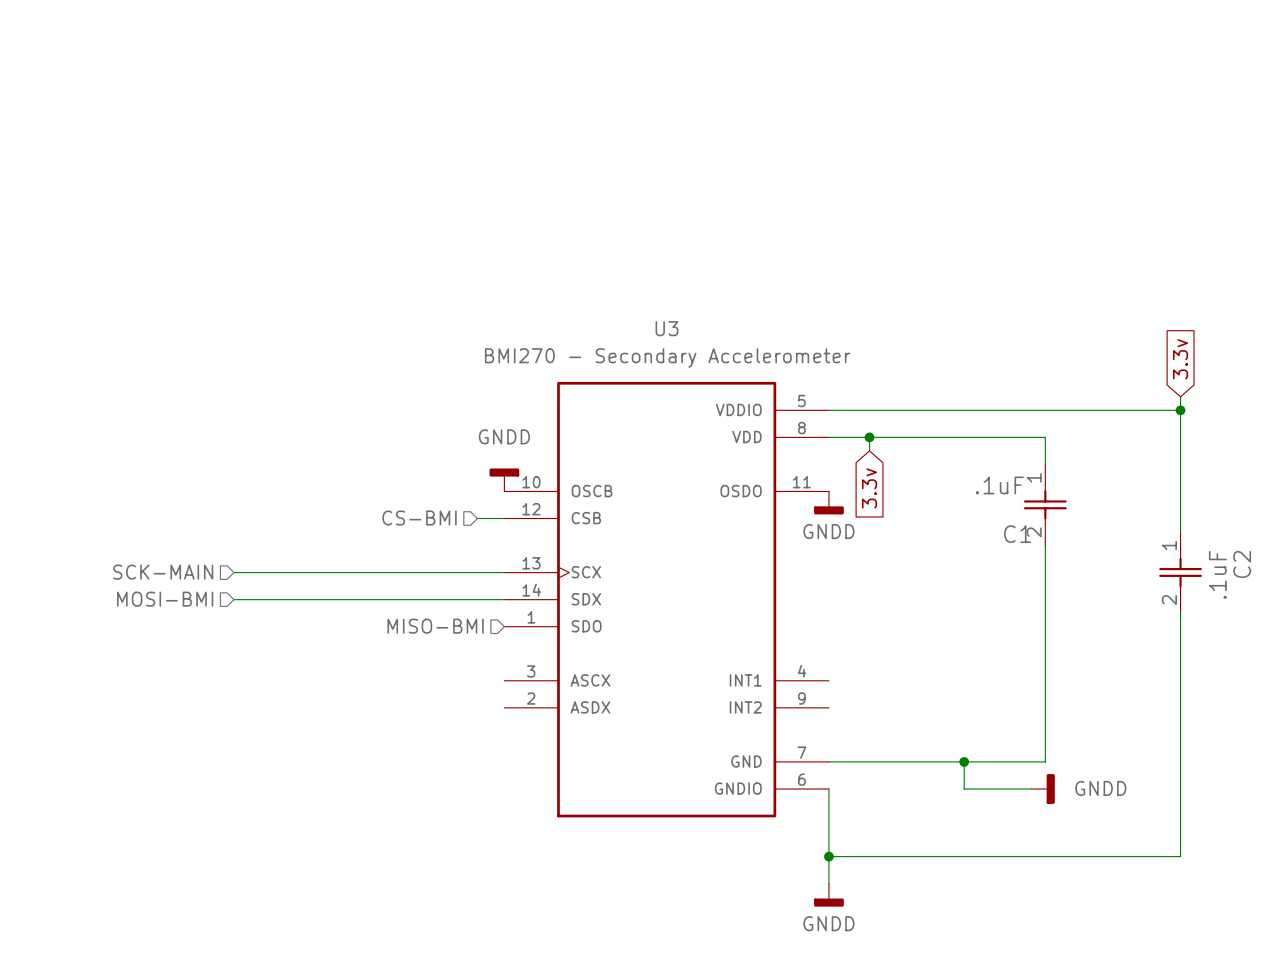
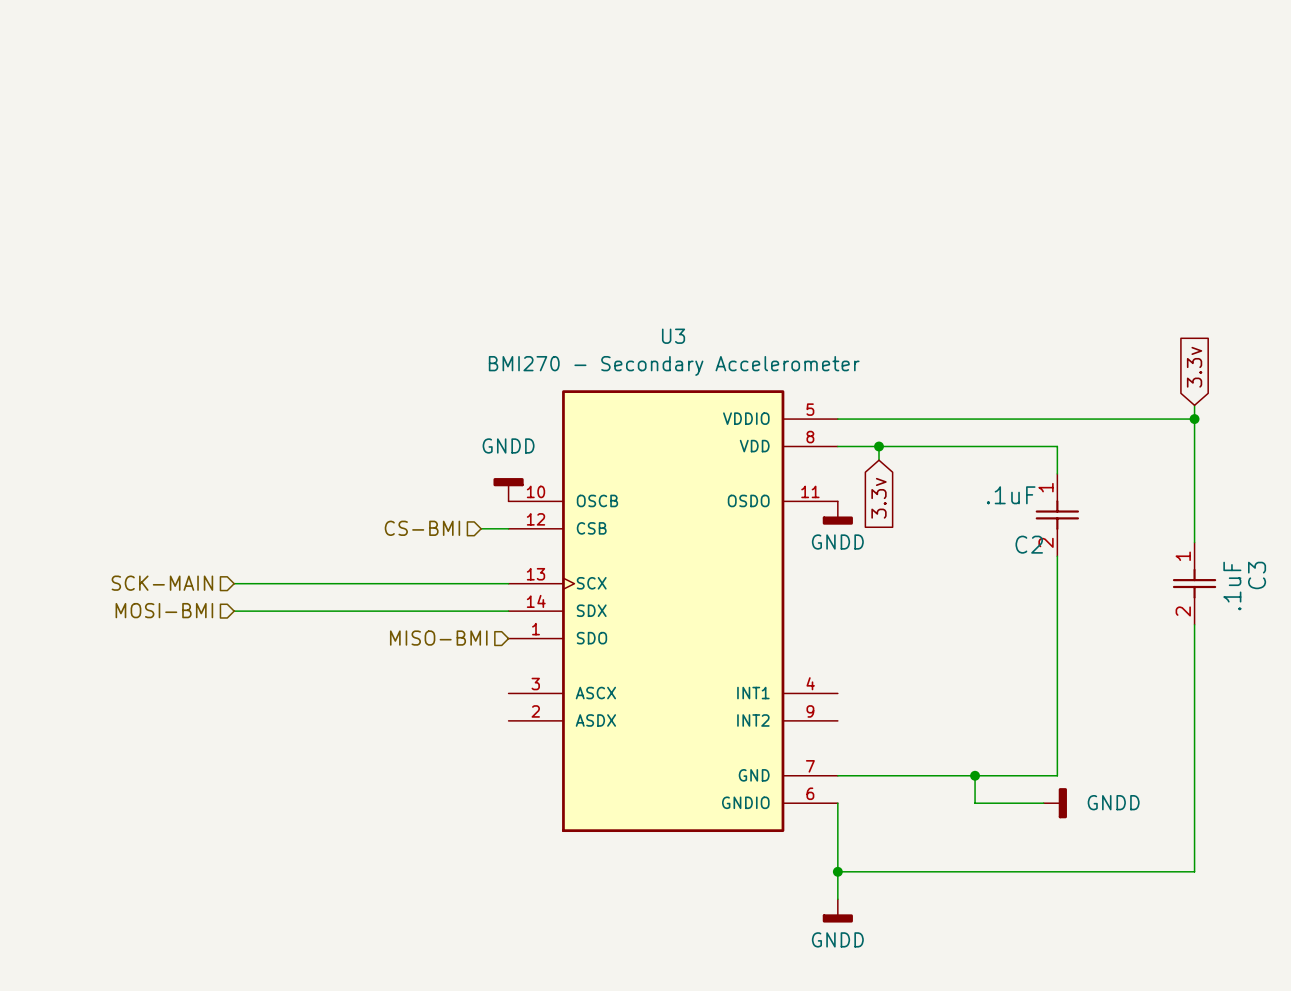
C1 name: C1 (1017, 534) -> C2 (1029, 544)
C2 name: C2 (1242, 564) -> C3 (1257, 575)

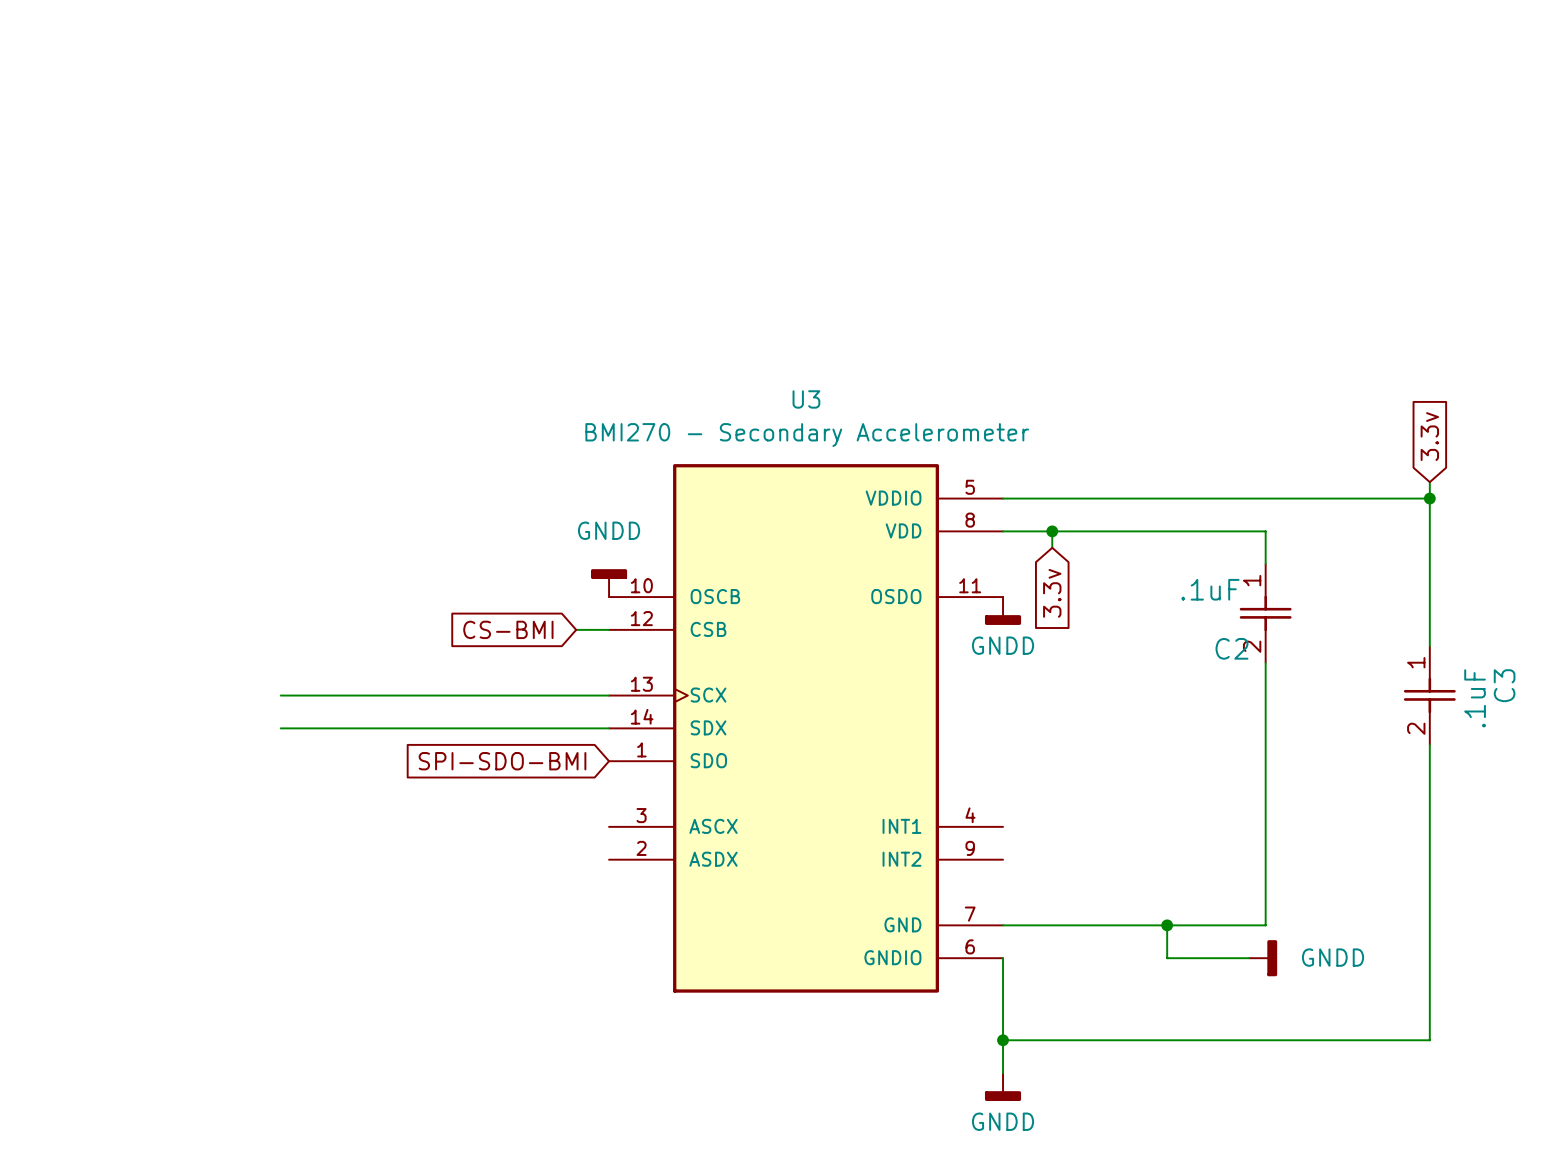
hierarchical label: CS-BMI (422, 528) -> none
global label: none -> CS-BMI (508, 629)
hierarchical label: SCK-MAIN (162, 583) -> none
hierarchical label: MOSI-BMI (164, 610) -> none
global label: none -> SPI-SDO-BMI (502, 761)
hierarchical label: MISO-BMI (438, 638) -> none

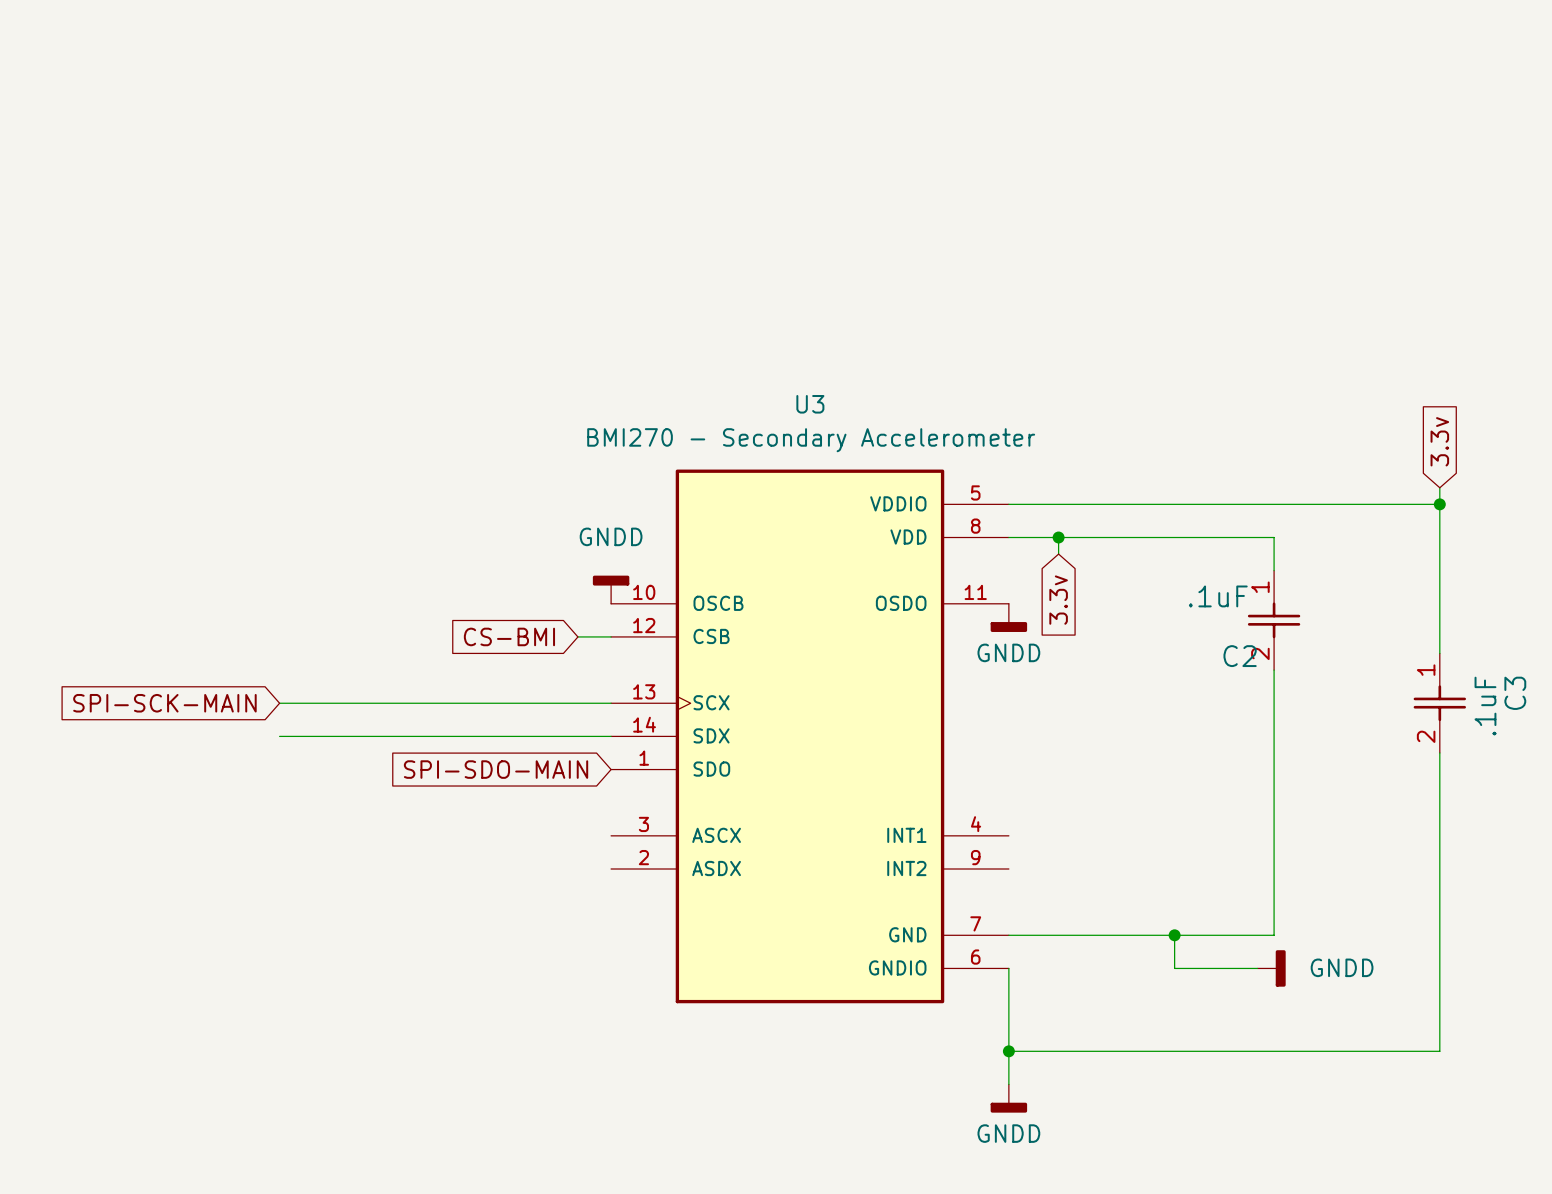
global label: none -> SPI-SCK-MAIN (164, 703)
global label: SPI-SDO-BMI (502, 761) -> SPI-SDO-MAIN (496, 769)

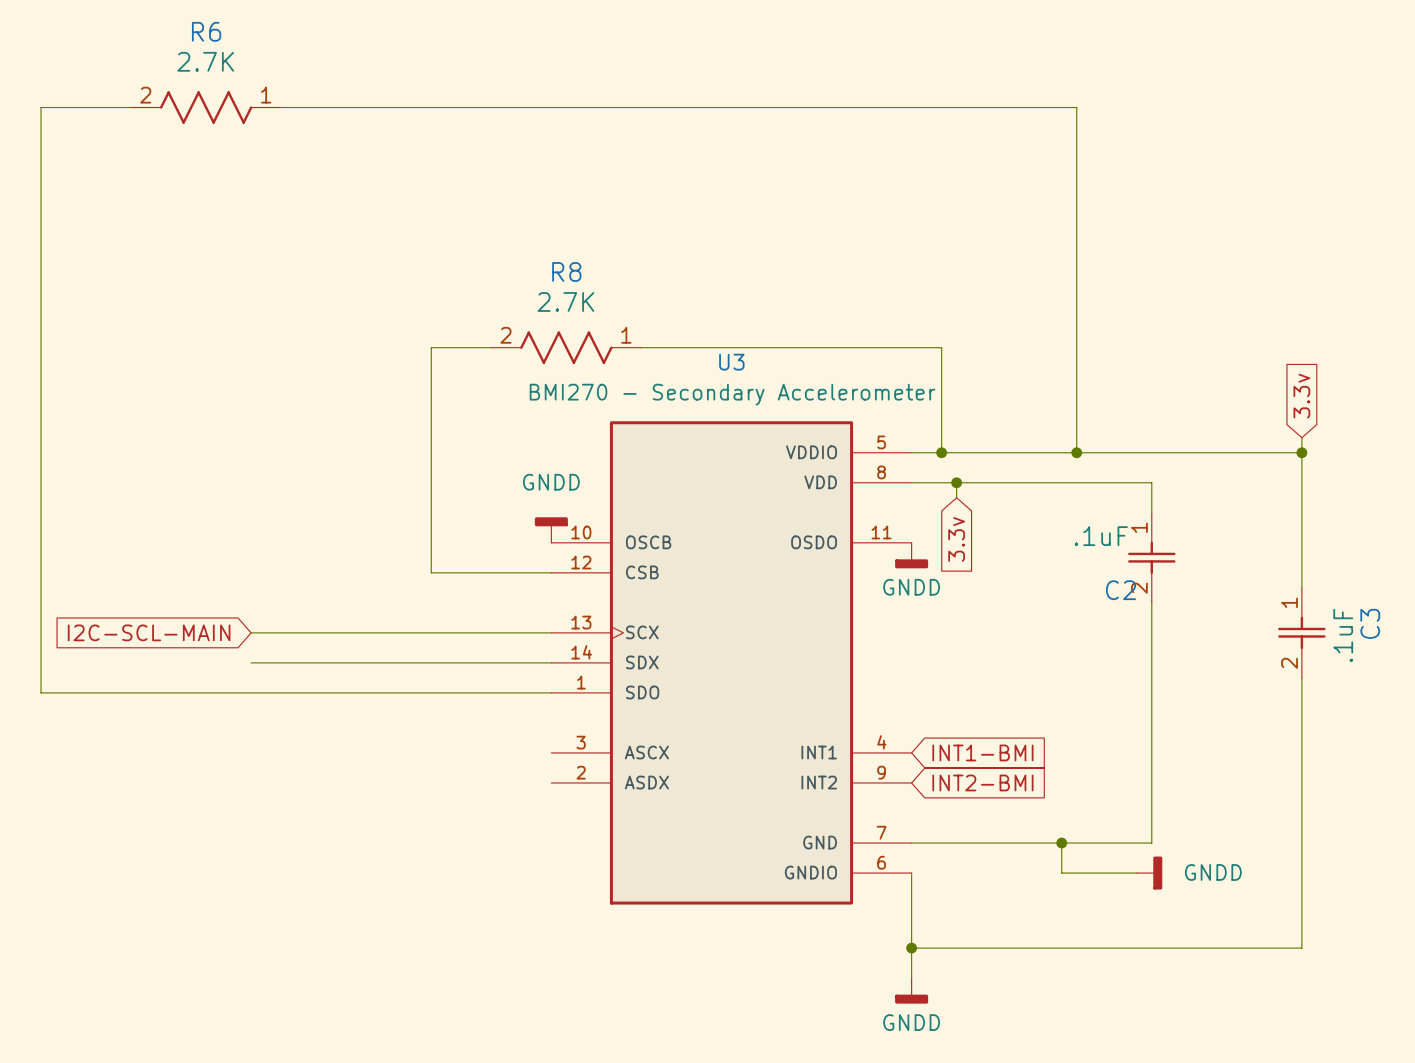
wire: none -> (131, 107) (41, 107) (41, 692) (551, 692)
R6: none -> 2.7K (206, 107)
wire: none -> (281, 107) (1076, 107) (1076, 452)
wire: none -> (491, 347) (431, 347) (431, 572) (521, 572)
R8: none -> 2.7K (566, 347)
wire: none -> (641, 347) (941, 347) (941, 452)
junction: none -> (941, 452)
junction: none -> (1076, 452)
global label: CS-BMI (509, 636) -> none
global label: SPI-SCK-MAIN (164, 703) -> I2C-SCL-MAIN (149, 632)
global label: SPI-SDO-MAIN (496, 769) -> none
global label: none -> INT1-BMI (982, 752)
global label: none -> INT2-BMI (982, 782)

